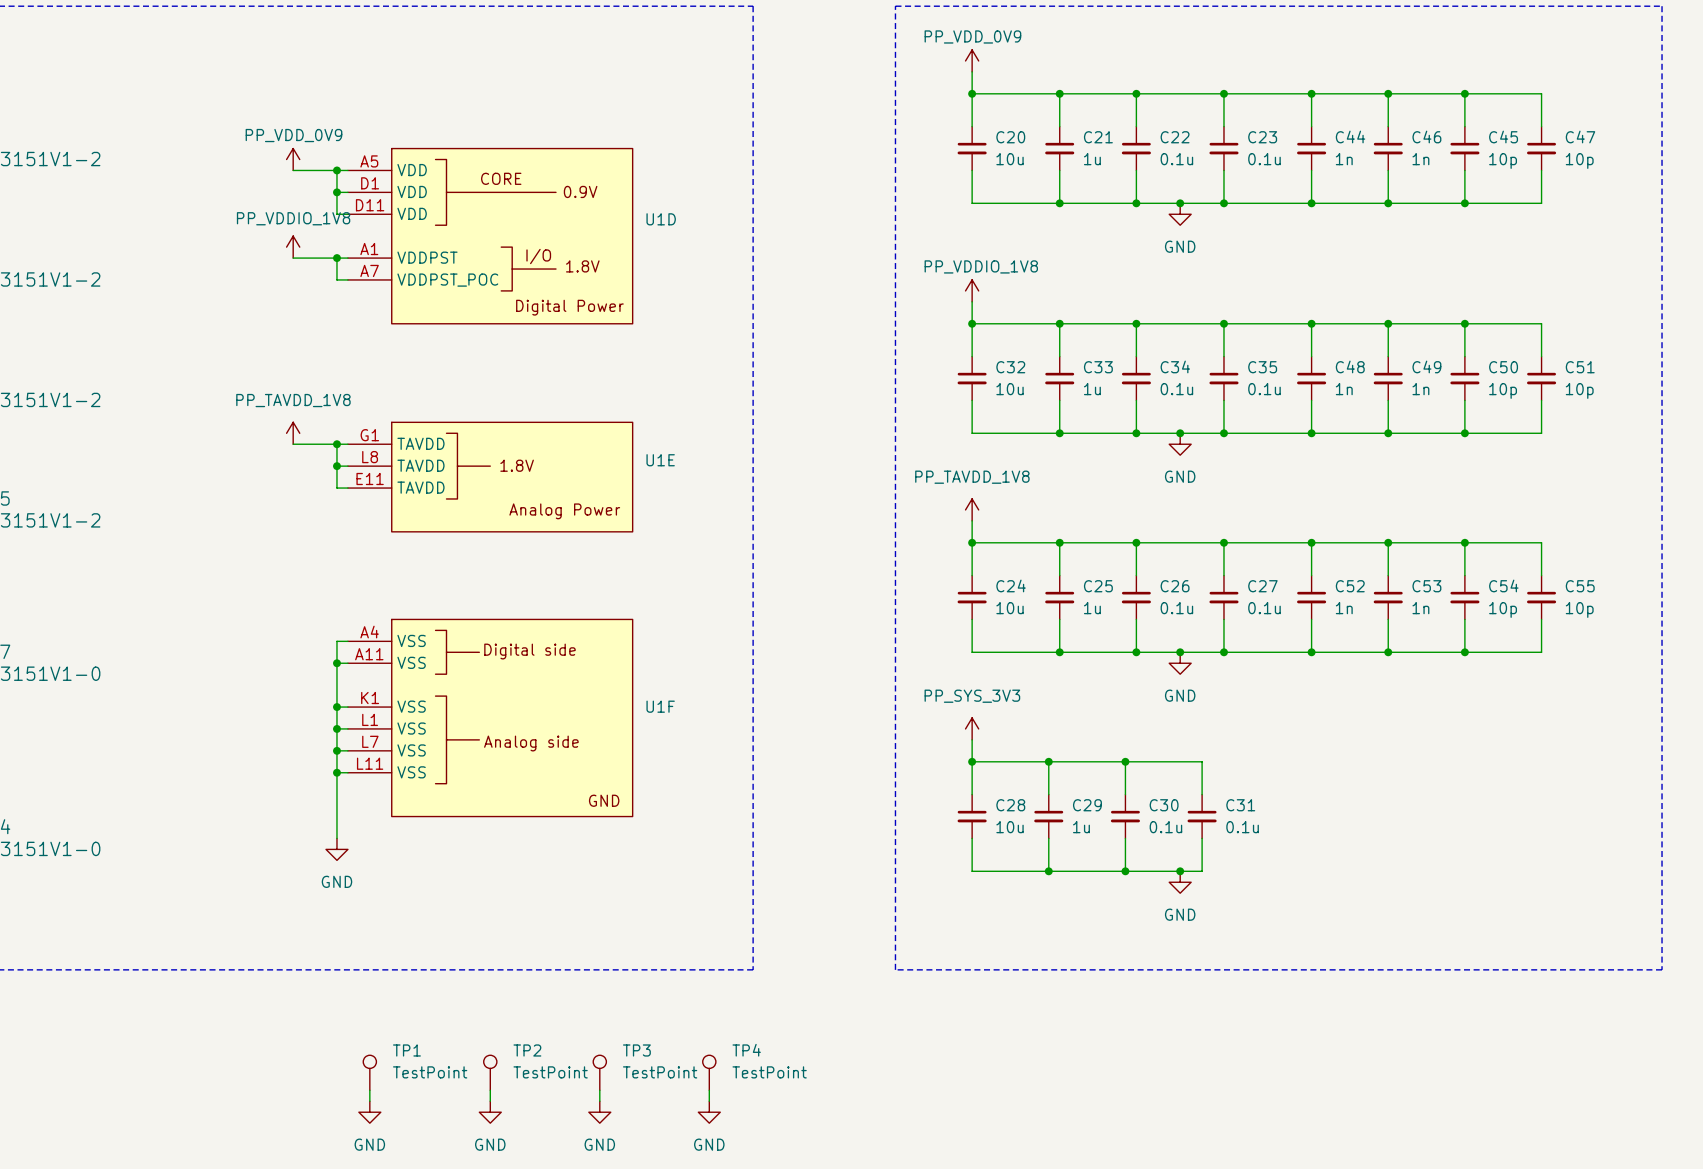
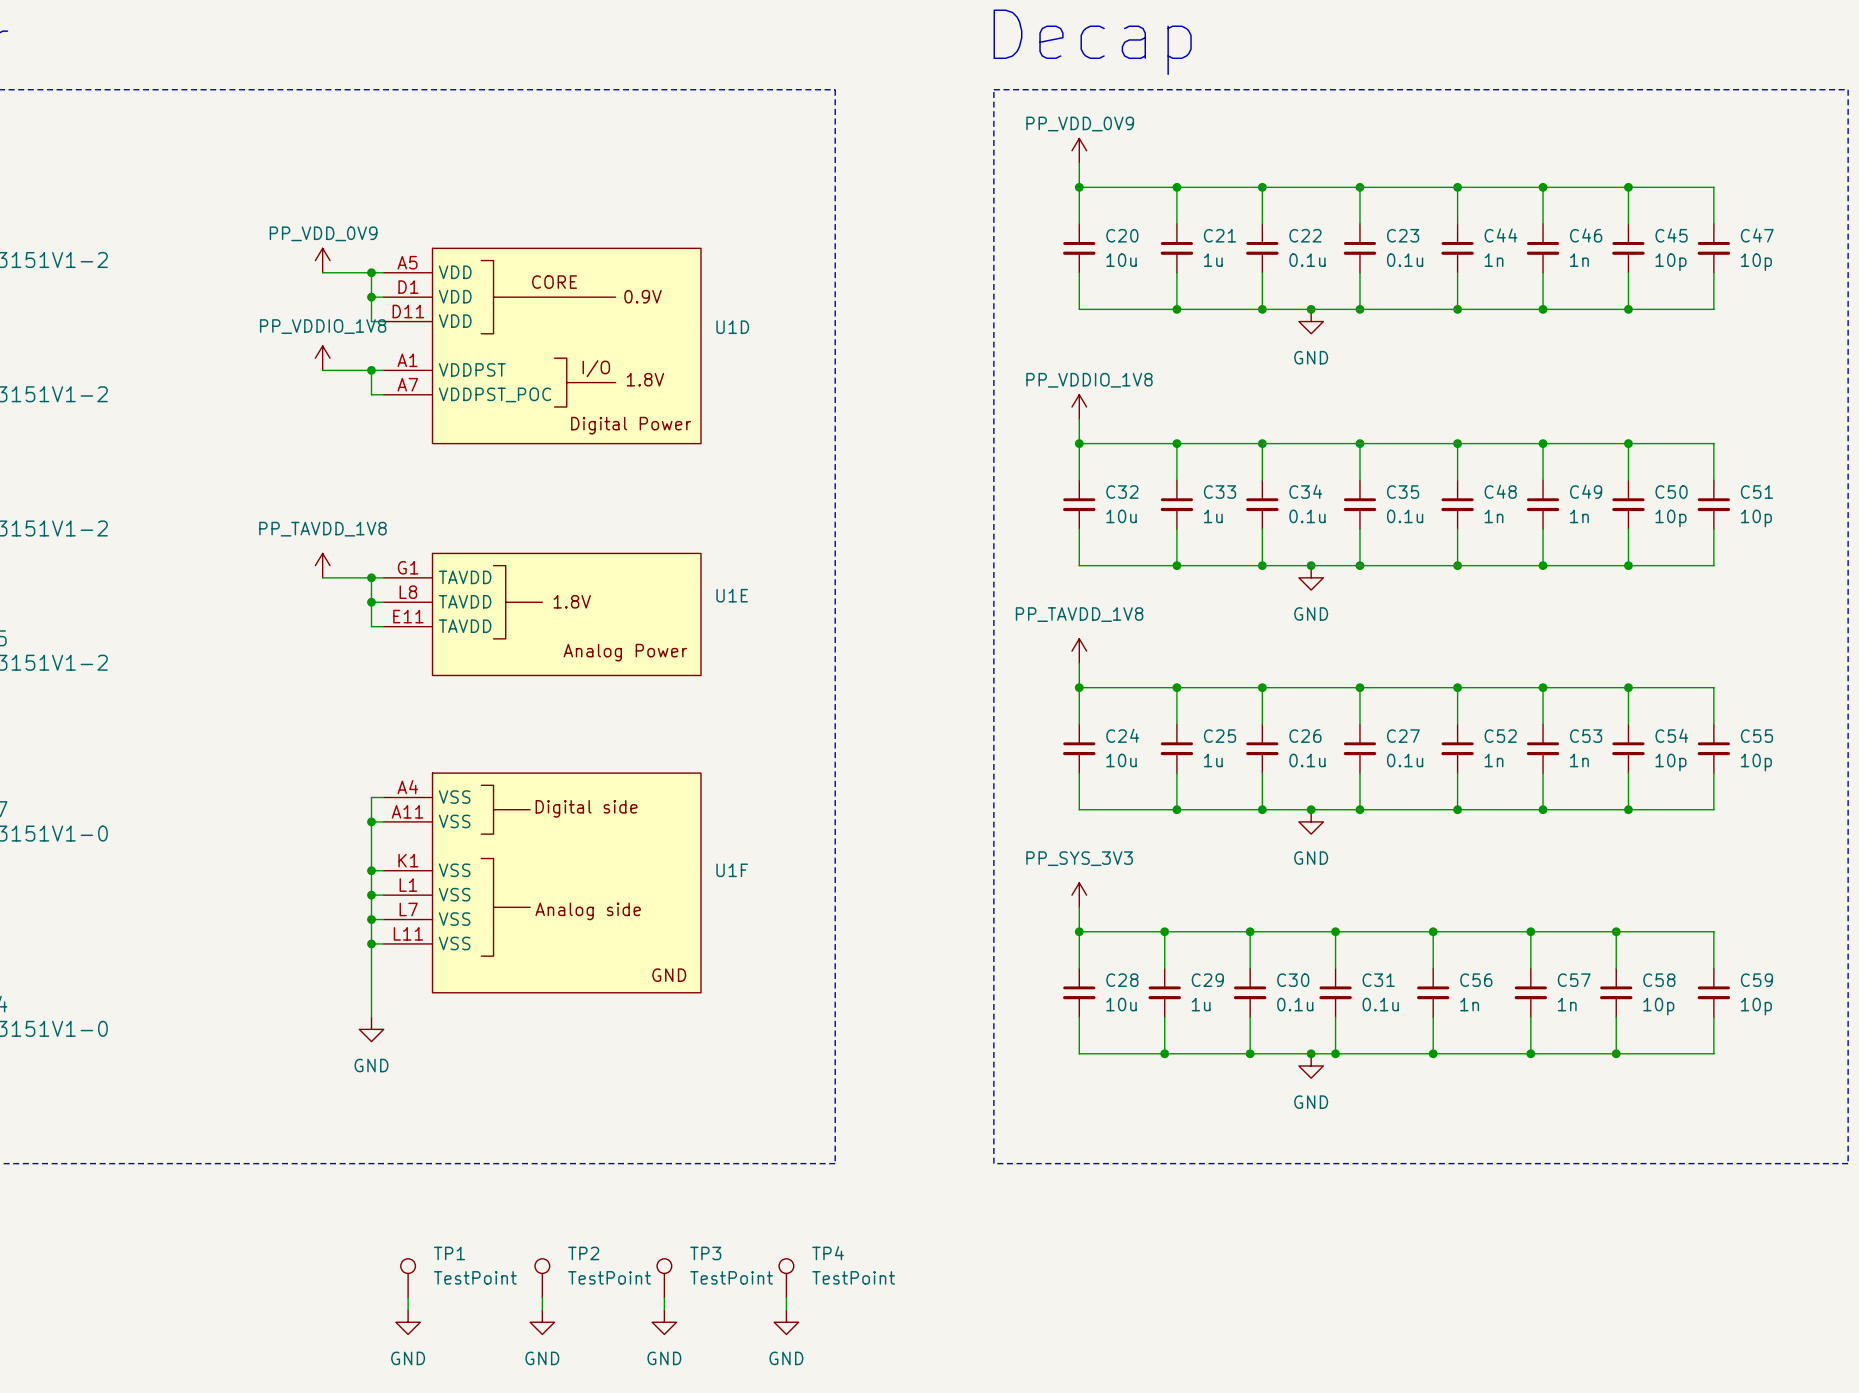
wire: none -> (1335, 931) (1713, 931) (1713, 968)
junction: none -> (1335, 931)
wire: none -> (1433, 931) (1433, 968)
junction: none -> (1433, 931)
wire: none -> (1530, 931) (1530, 968)
junction: none -> (1530, 931)
wire: none -> (1616, 931) (1616, 968)
junction: none -> (1616, 931)
C56: none -> 1n (1433, 992)
C57: none -> 1n (1530, 992)
C58: none -> 10p (1616, 992)
C59: none -> 10p (1713, 992)
wire: none -> (1433, 1017) (1433, 1053)
wire: none -> (1530, 1017) (1530, 1053)
wire: none -> (1616, 1017) (1616, 1053)
wire: none -> (1713, 1017) (1713, 1053) (1335, 1053)
junction: none -> (1335, 1053)
junction: none -> (1433, 1053)
junction: none -> (1530, 1053)
junction: none -> (1616, 1053)

